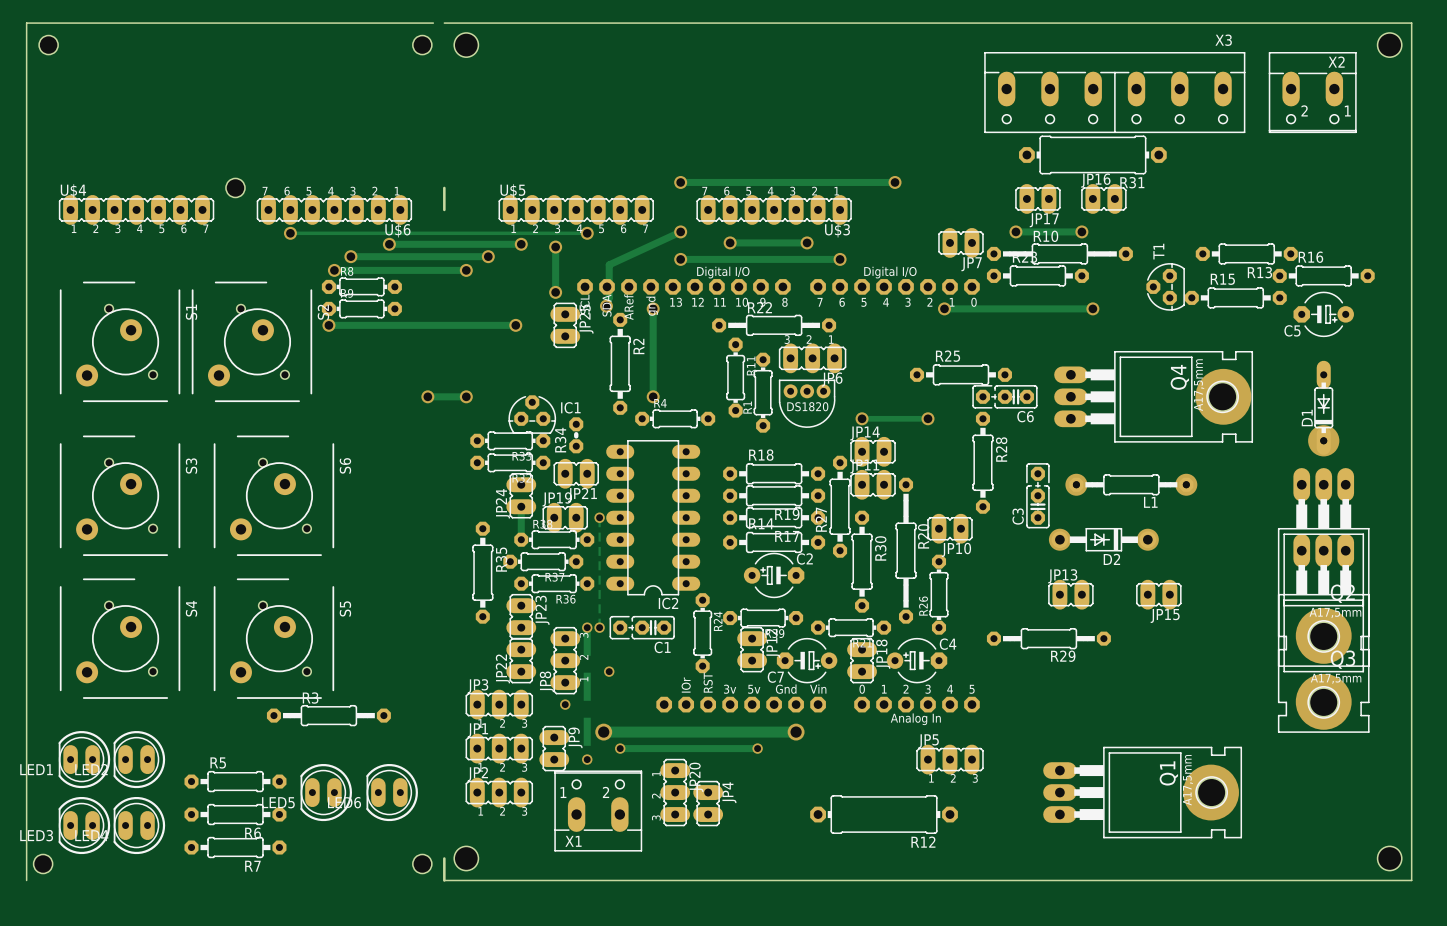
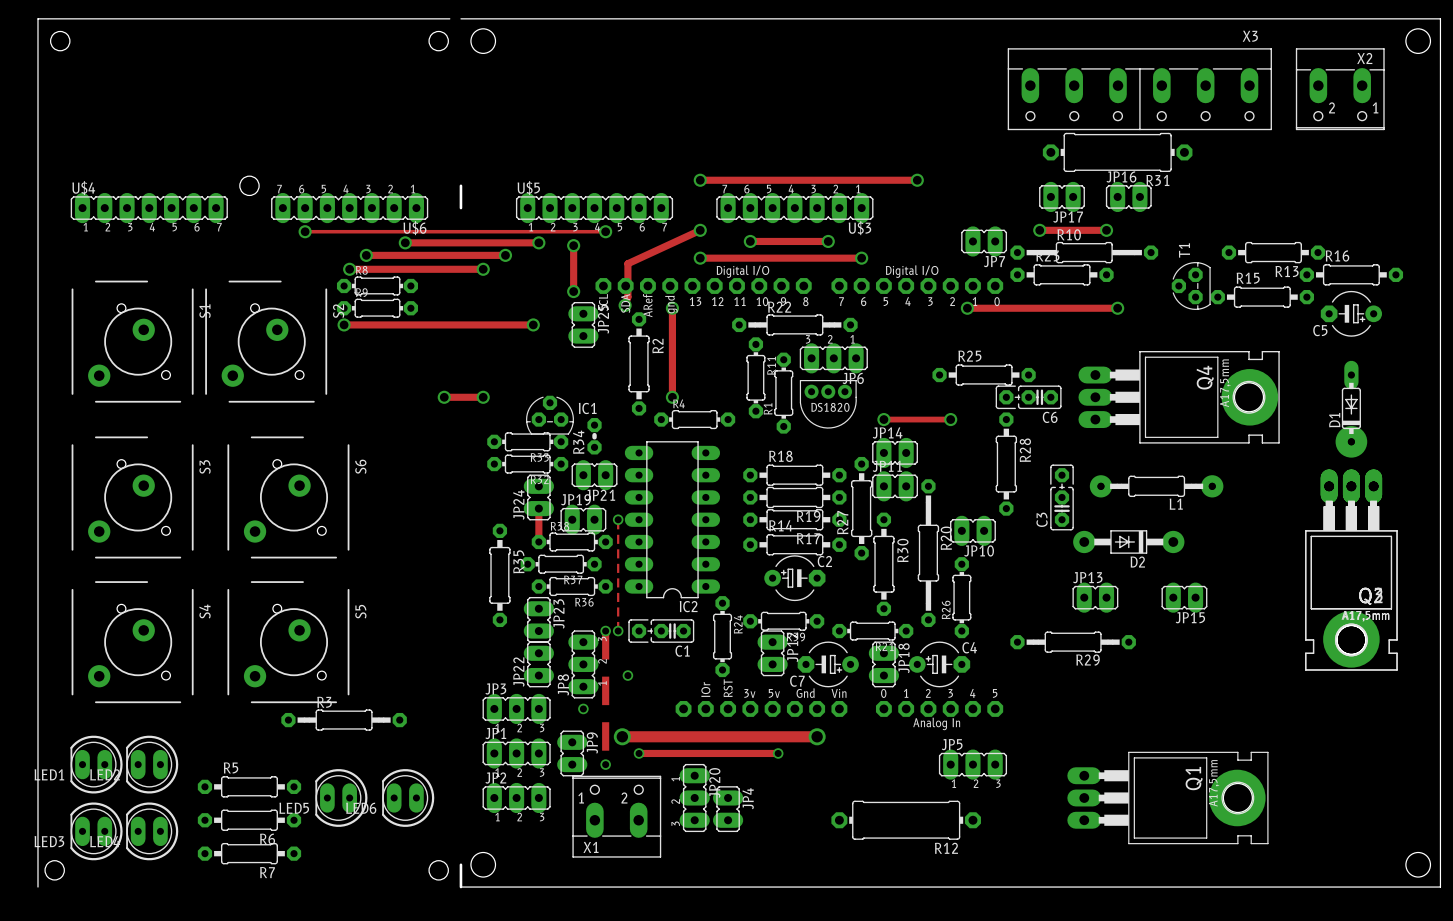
Q3 position: (1323, 633) -> (1351, 569)
via: (1323, 701) -> none

